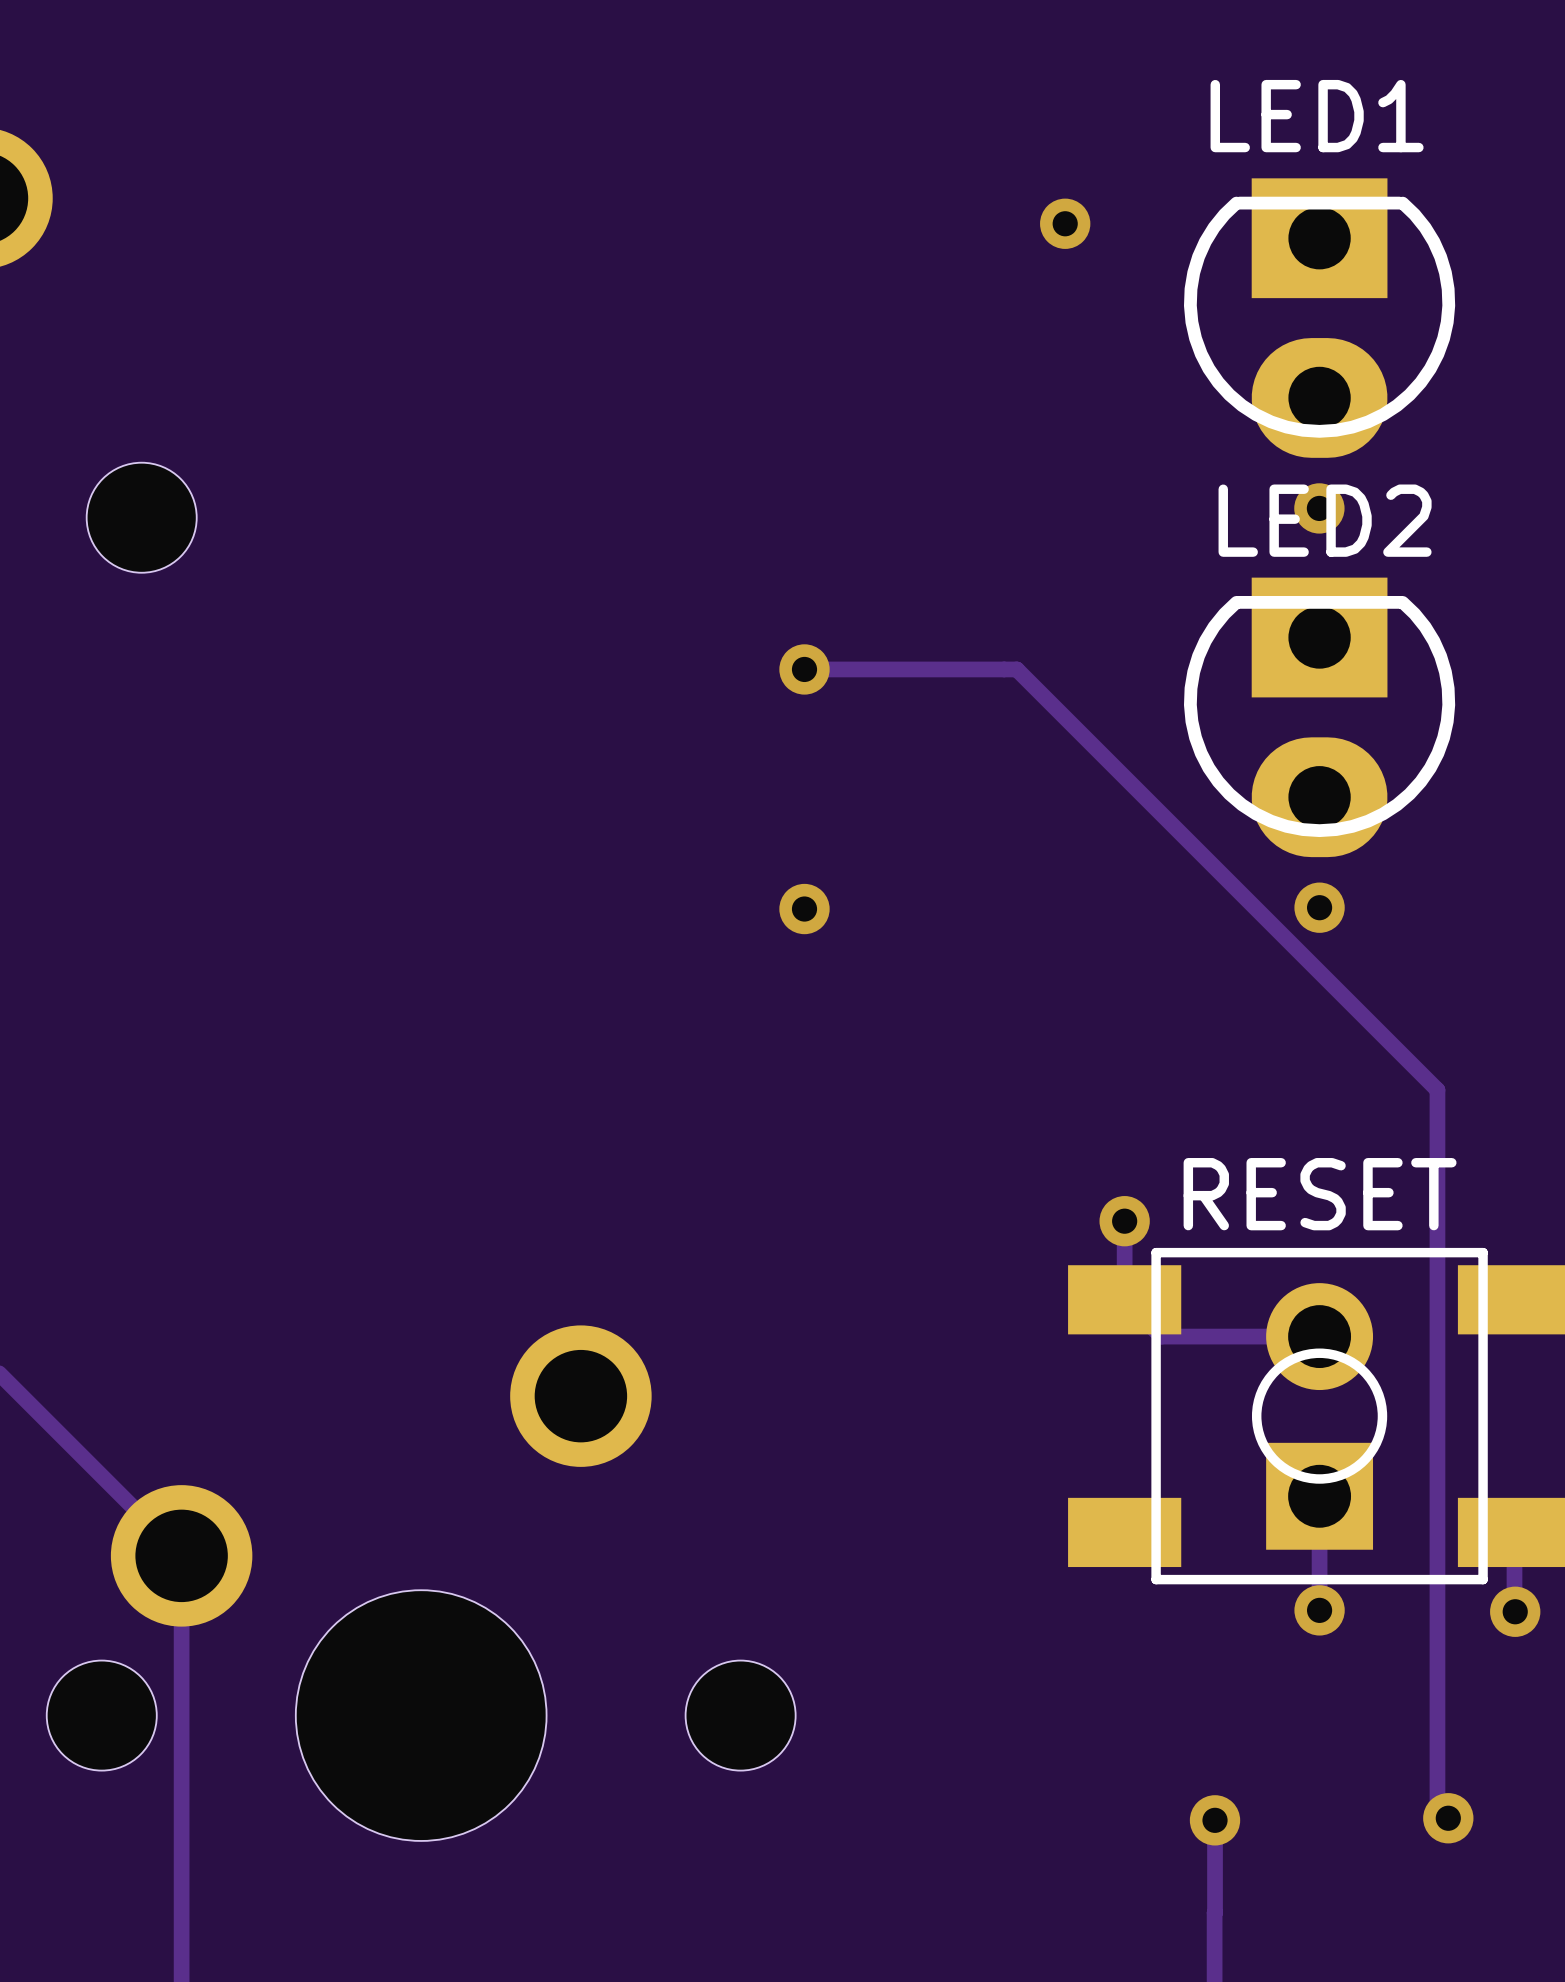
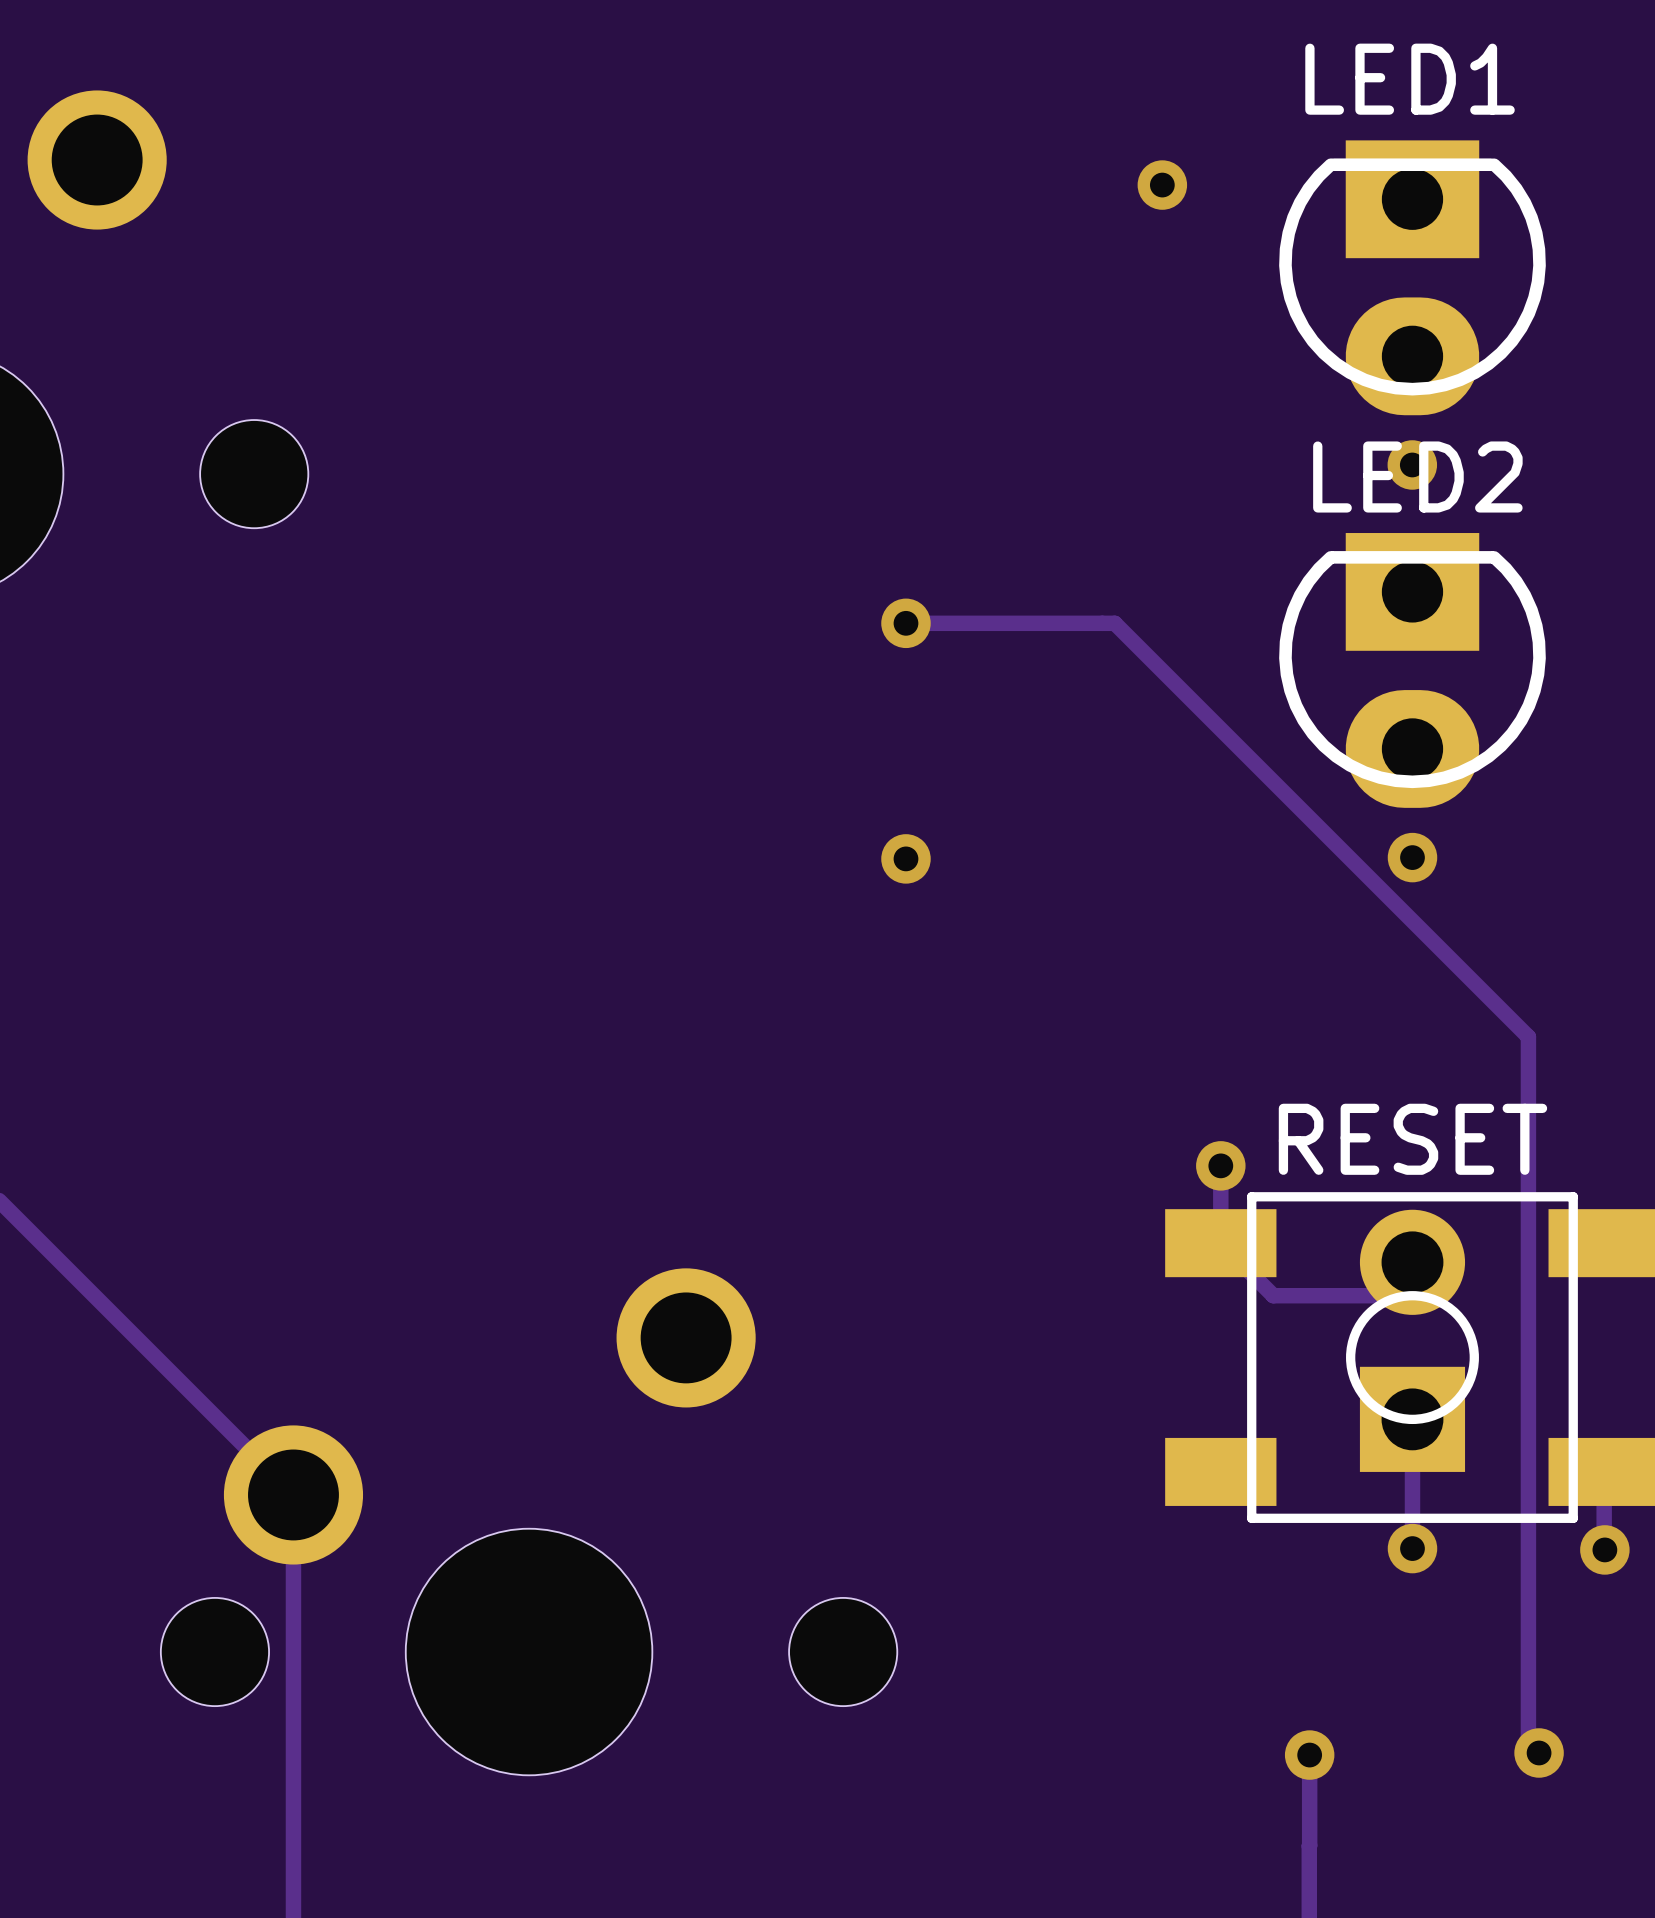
track: (1161, 1336) (1319, 1336) -> (1256, 1279) (1273, 1295) (1412, 1295)
part position: (1319, 1416) -> (1412, 1340)

